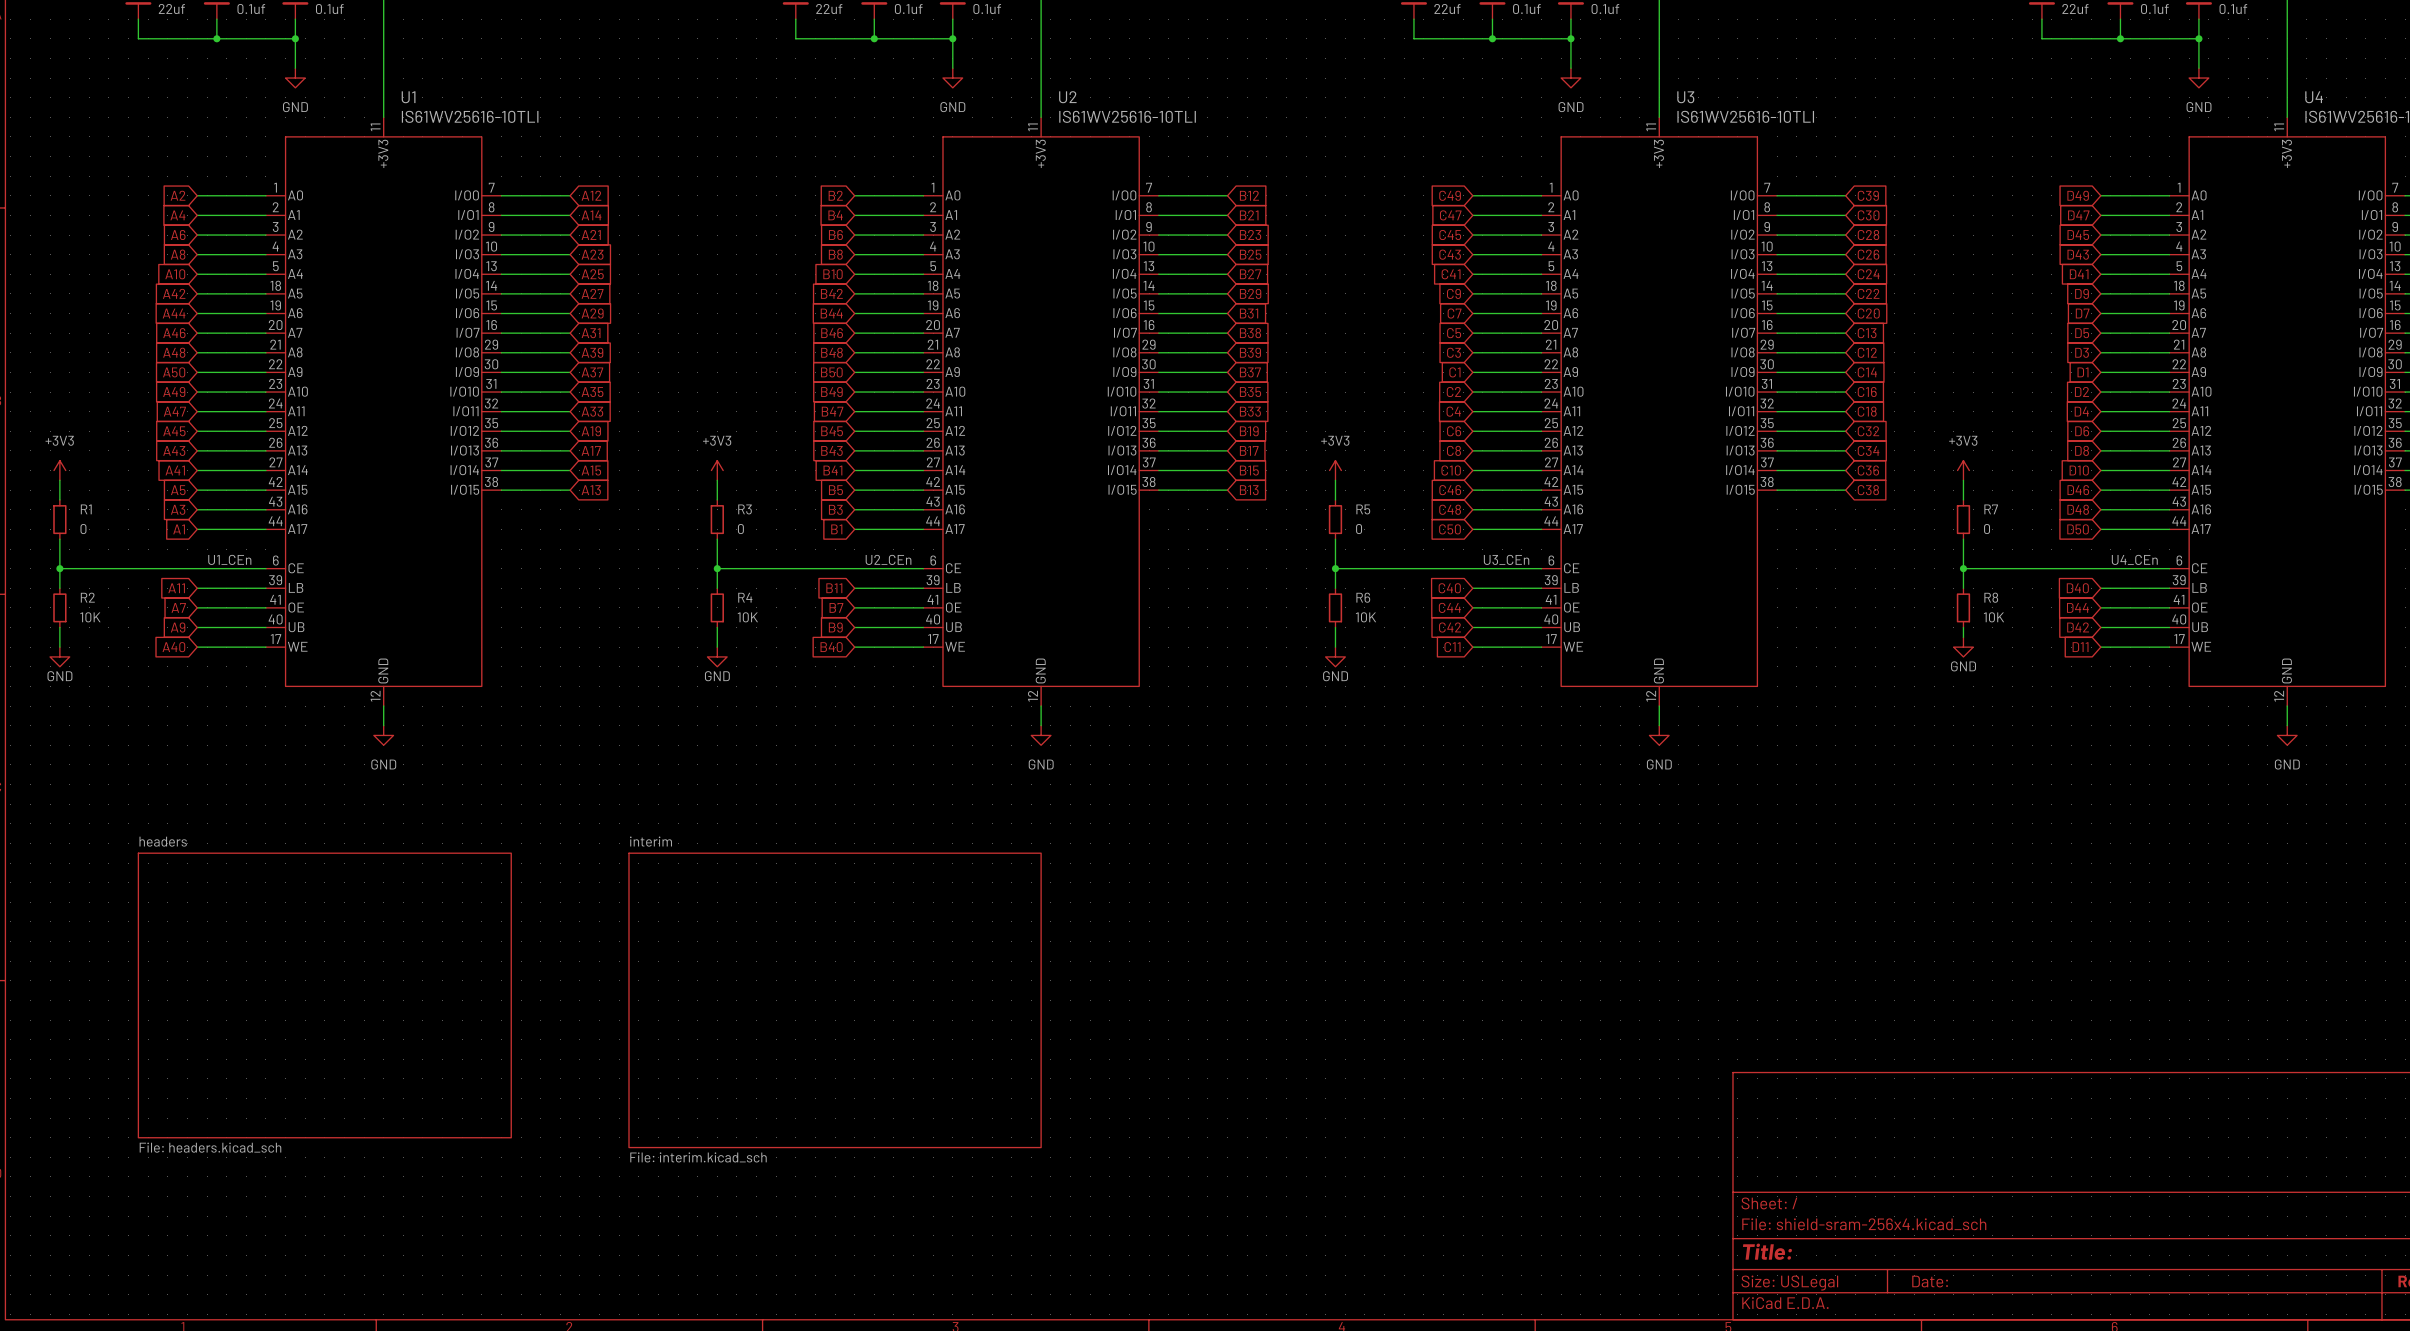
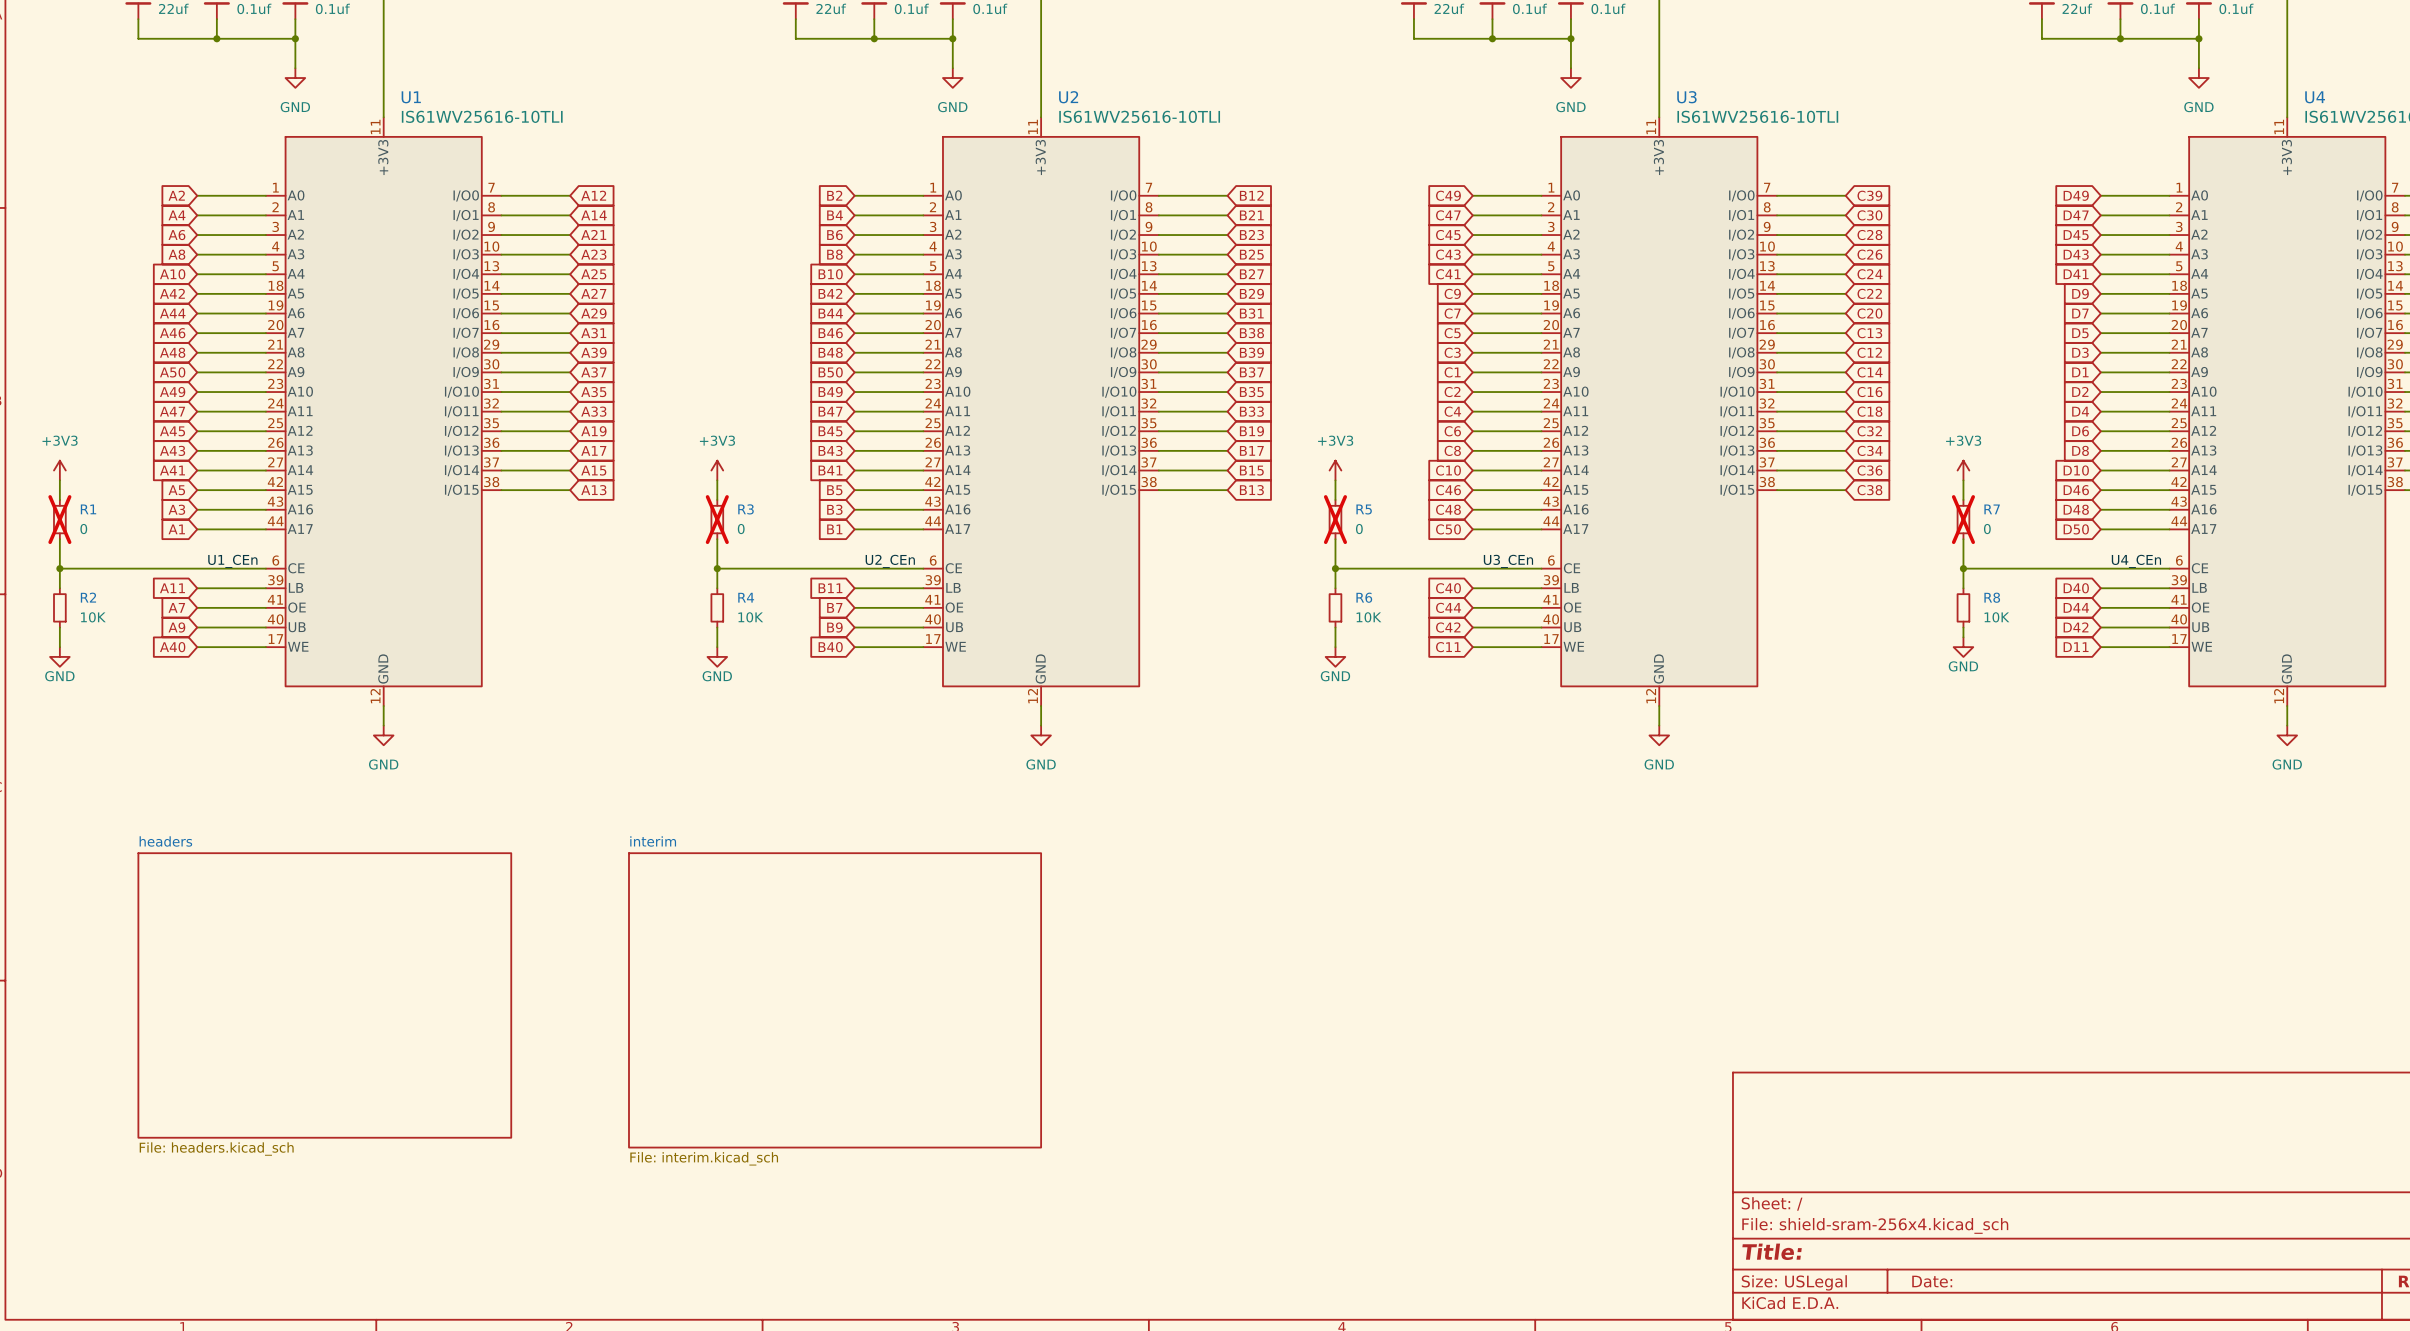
R1 do-not-place cross: none -> (59, 519)
R3 do-not-place cross: none -> (717, 519)
R5 do-not-place cross: none -> (1335, 519)
R7 do-not-place cross: none -> (1963, 519)

